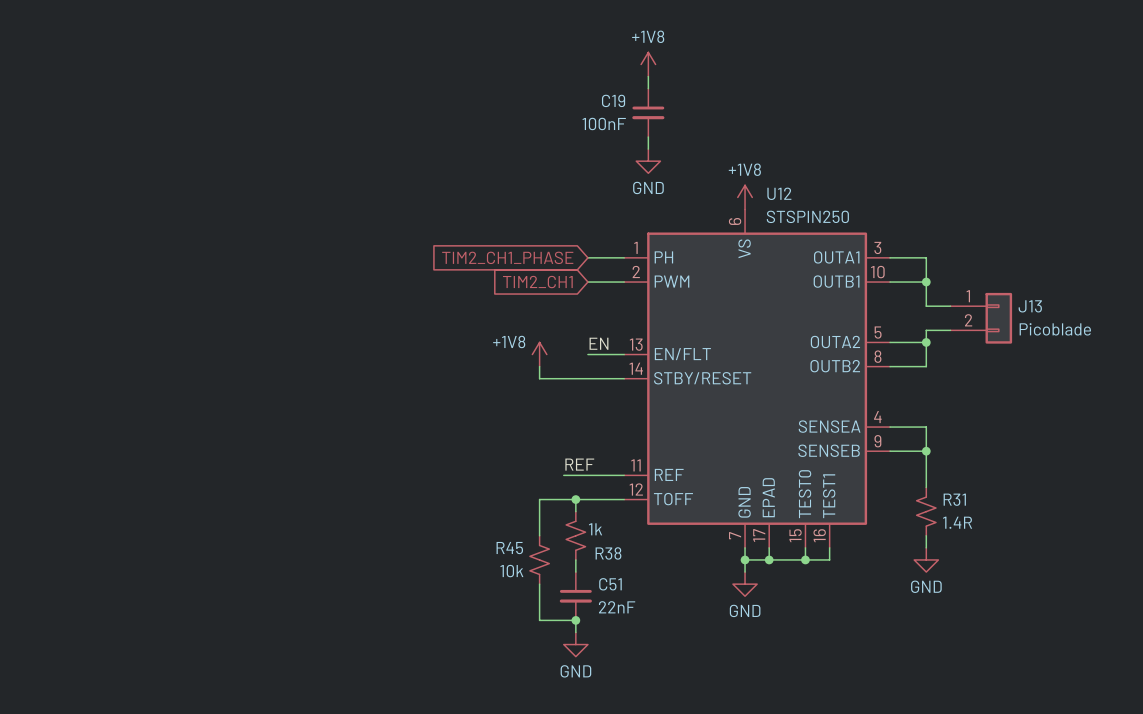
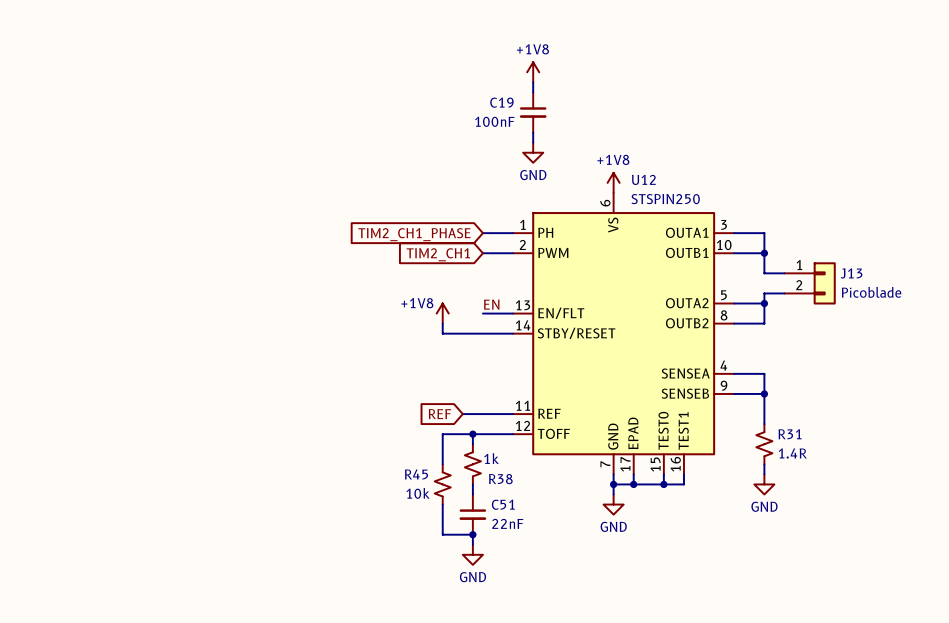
label: REF (579, 464) -> none
global label: none -> REF (439, 414)

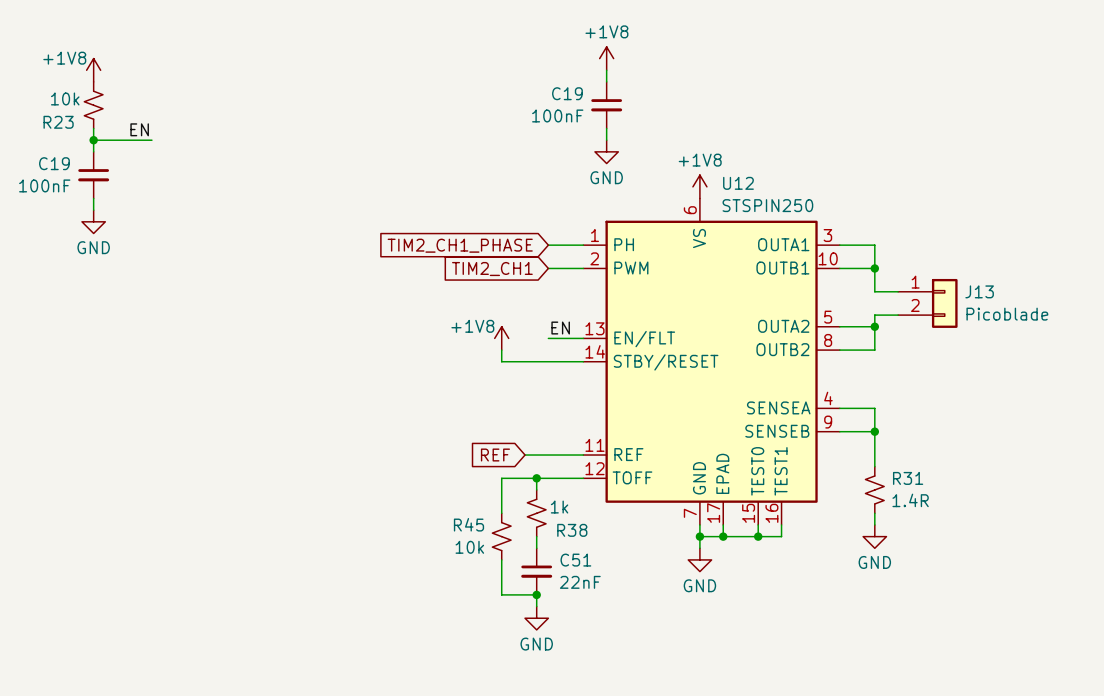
power symbol: none -> +1V8 (93, 70)
R23: none -> 10k (93, 105)
wire: none -> (93, 128) (93, 151)
label: none -> EN (139, 129)
wire: none -> (93, 140) (151, 140)
junction: none -> (93, 140)
C19: none -> 100nF (93, 175)
wire: none -> (93, 198) (93, 210)
power symbol: none -> GND (93, 221)

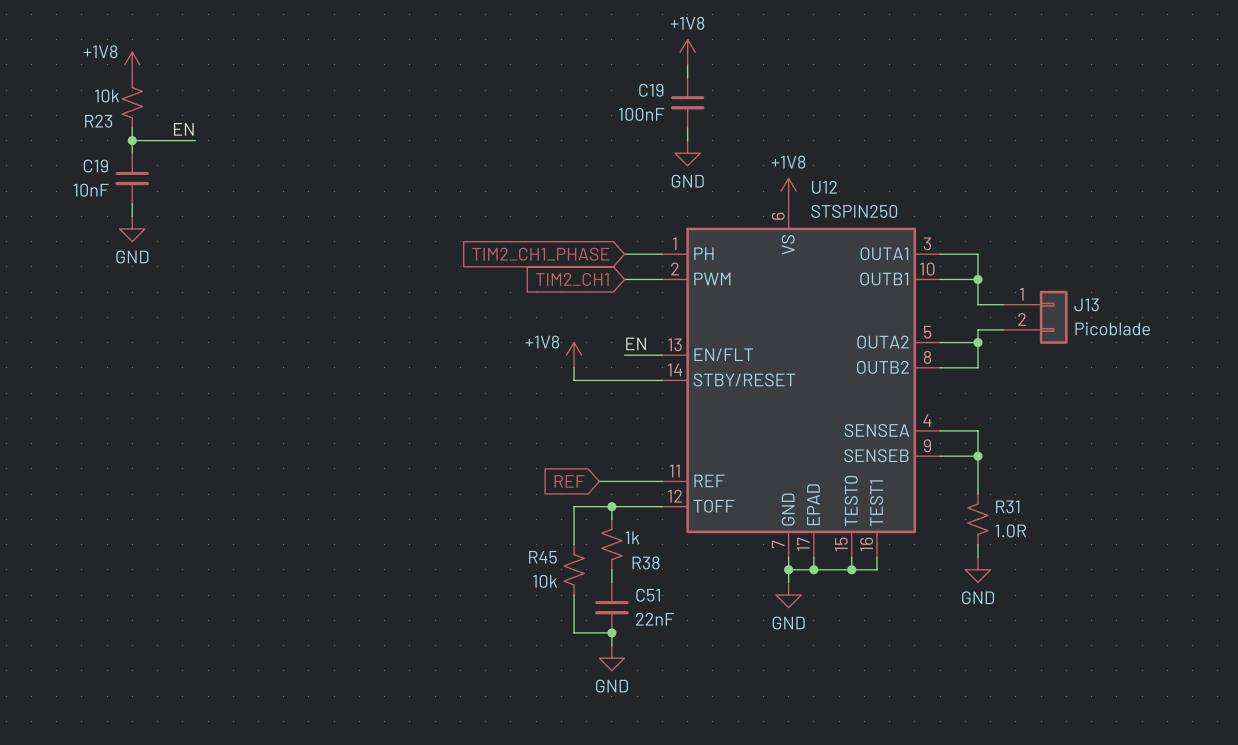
C19 value: 100nF (44, 185) -> 10nF (91, 190)
R31 value: 1.4R (910, 500) -> 1.0R (1010, 530)

